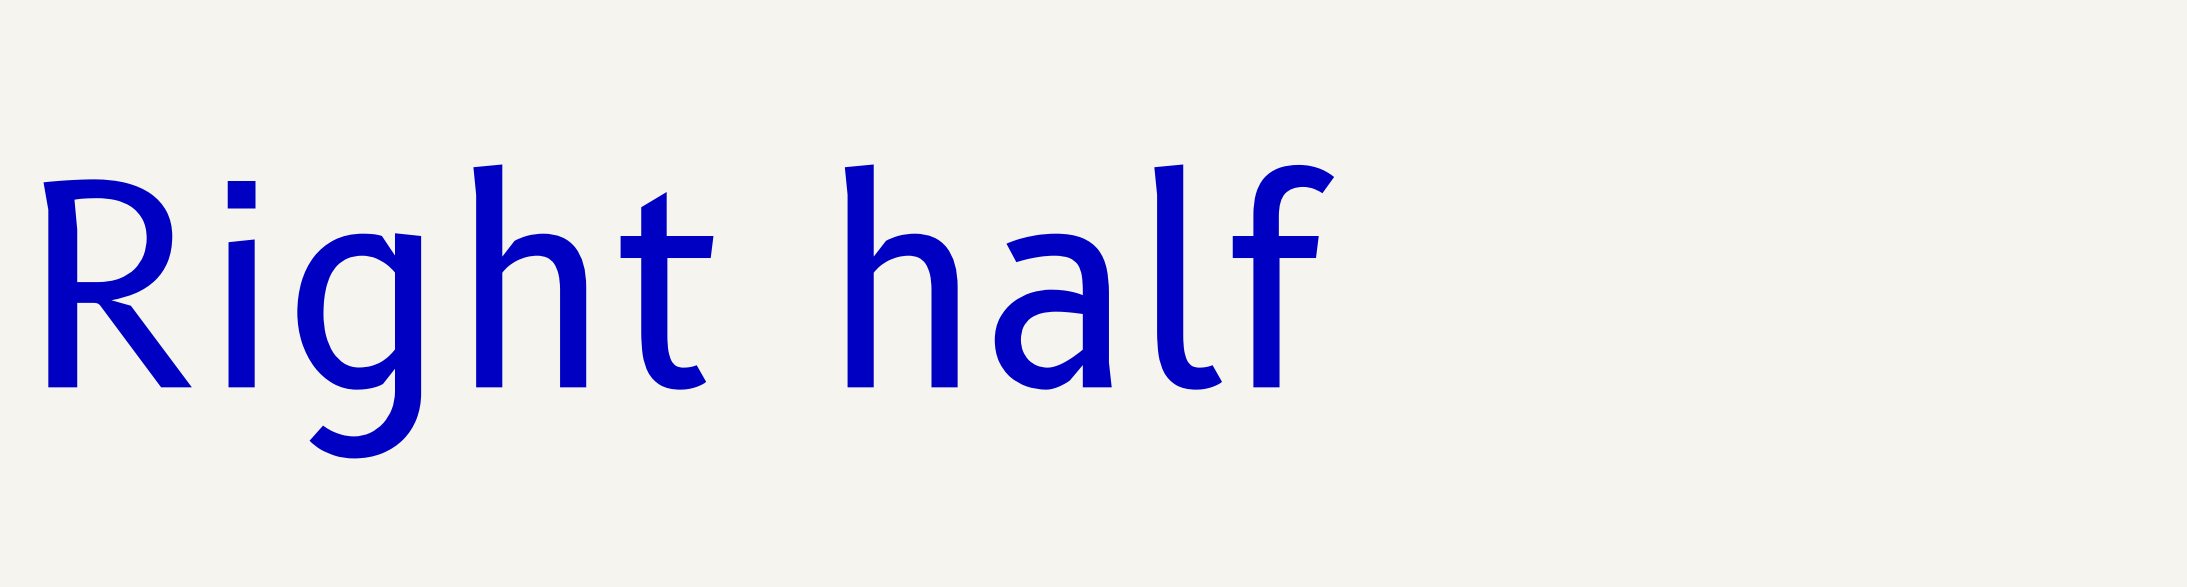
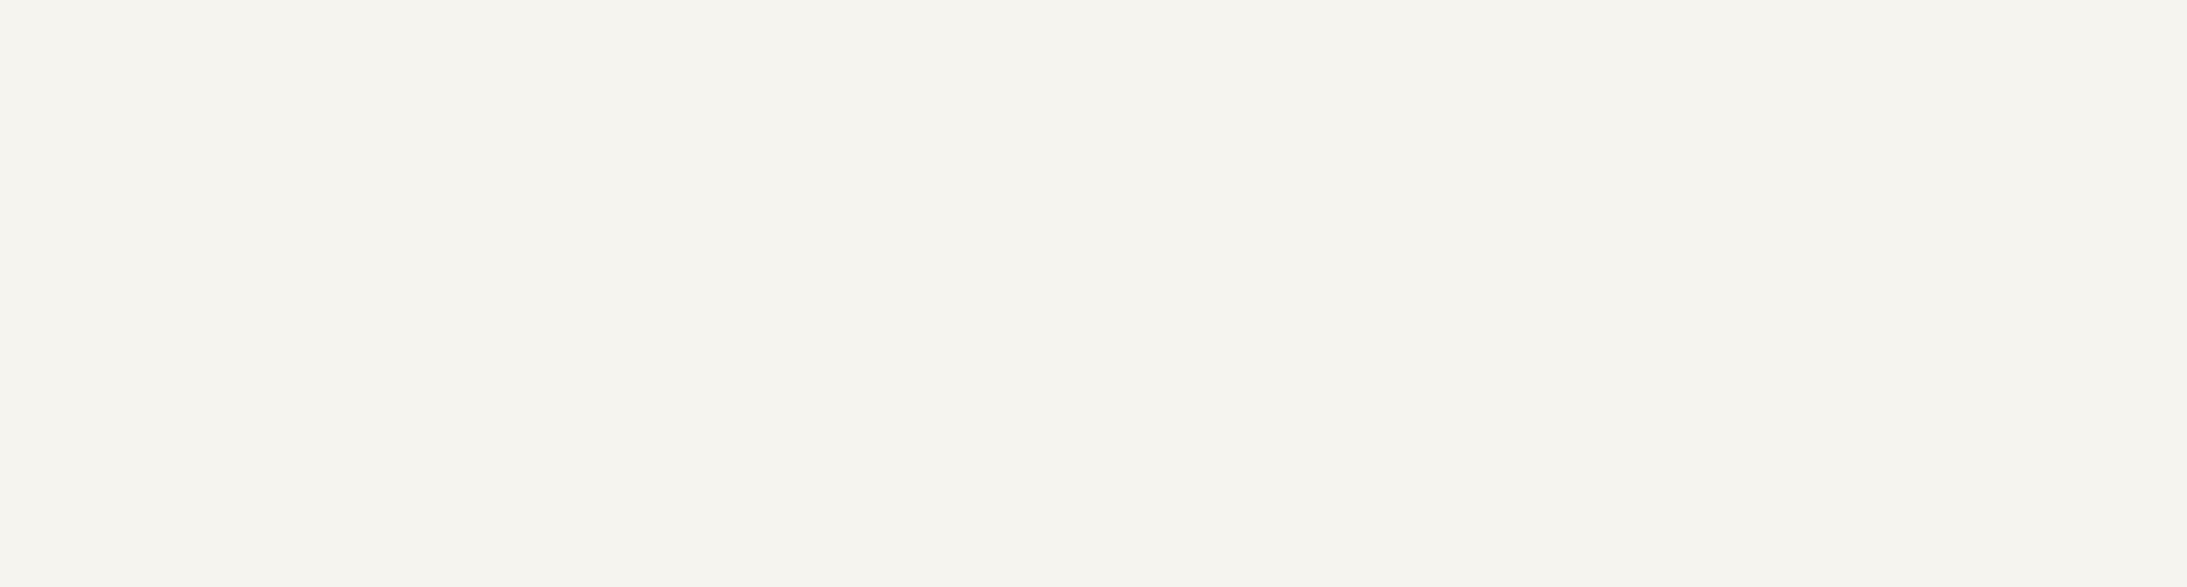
text: Right half (688, 311) -> none

